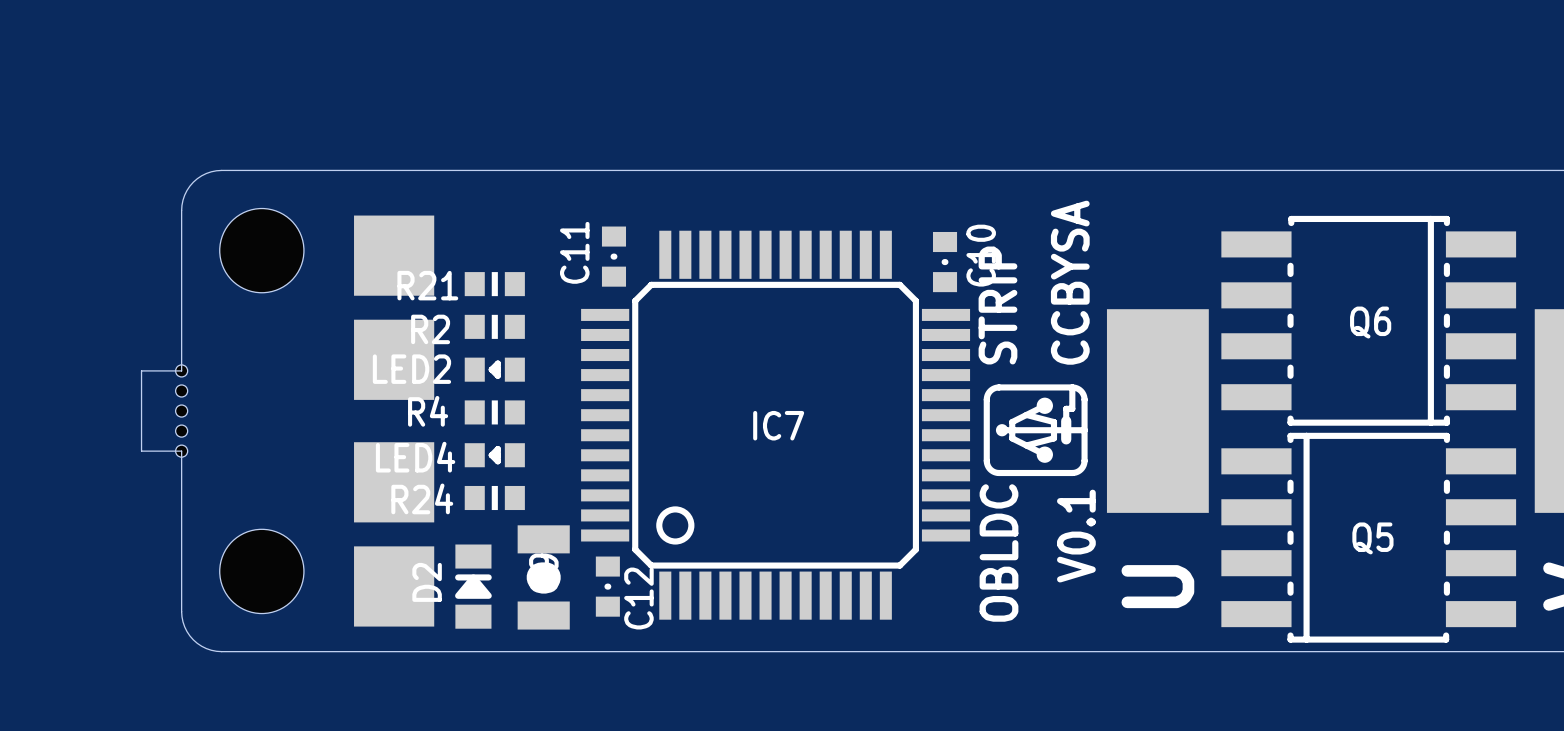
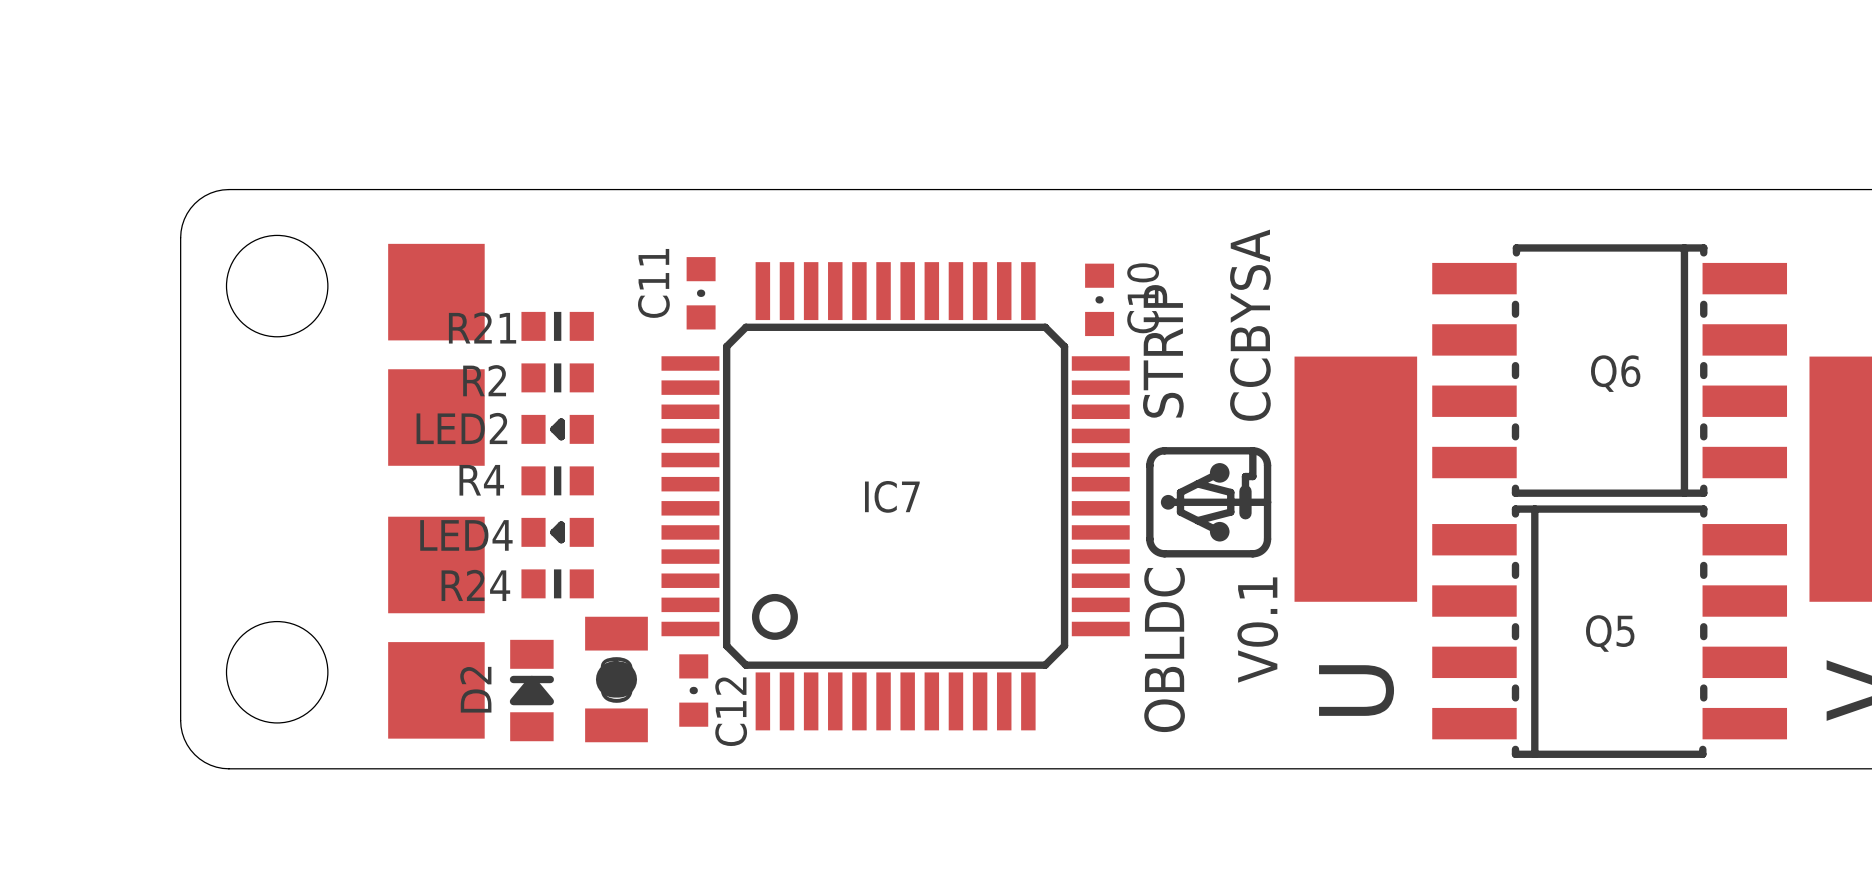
board edge: (181, 370) (141, 370) (141, 451) (181, 451) -> (180, 430) (180, 527)
hole: (181, 370) -> none
hole: (181, 390) -> none
hole: (181, 411) -> none
hole: (181, 431) -> none
hole: (181, 451) -> none

